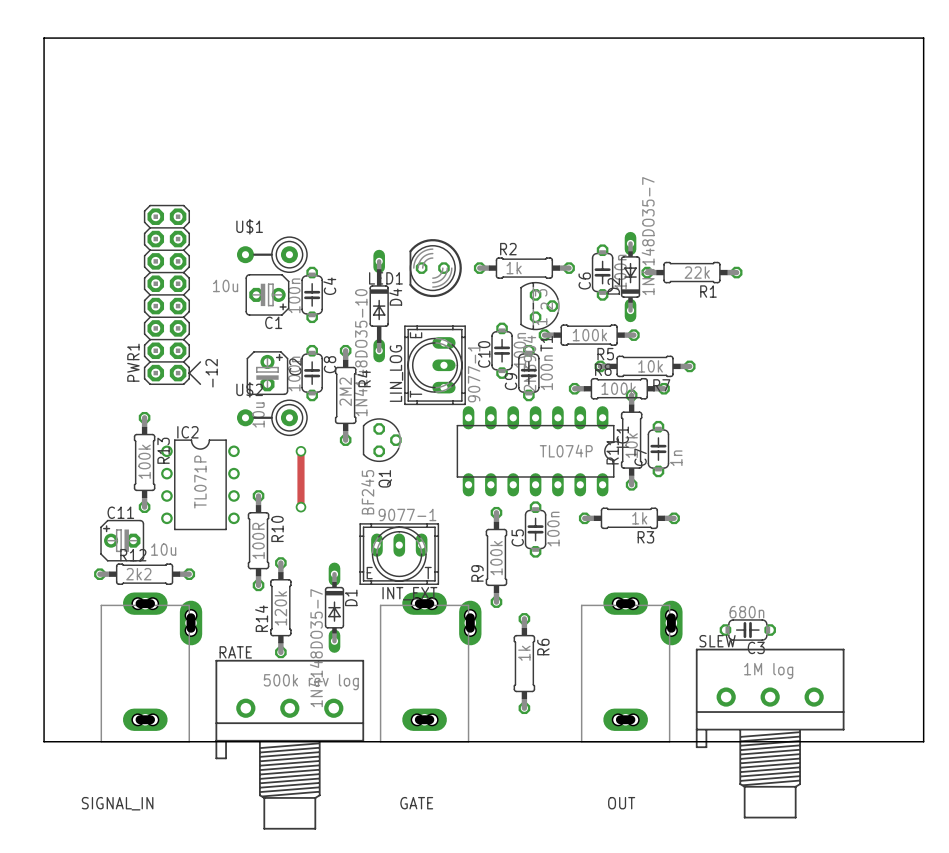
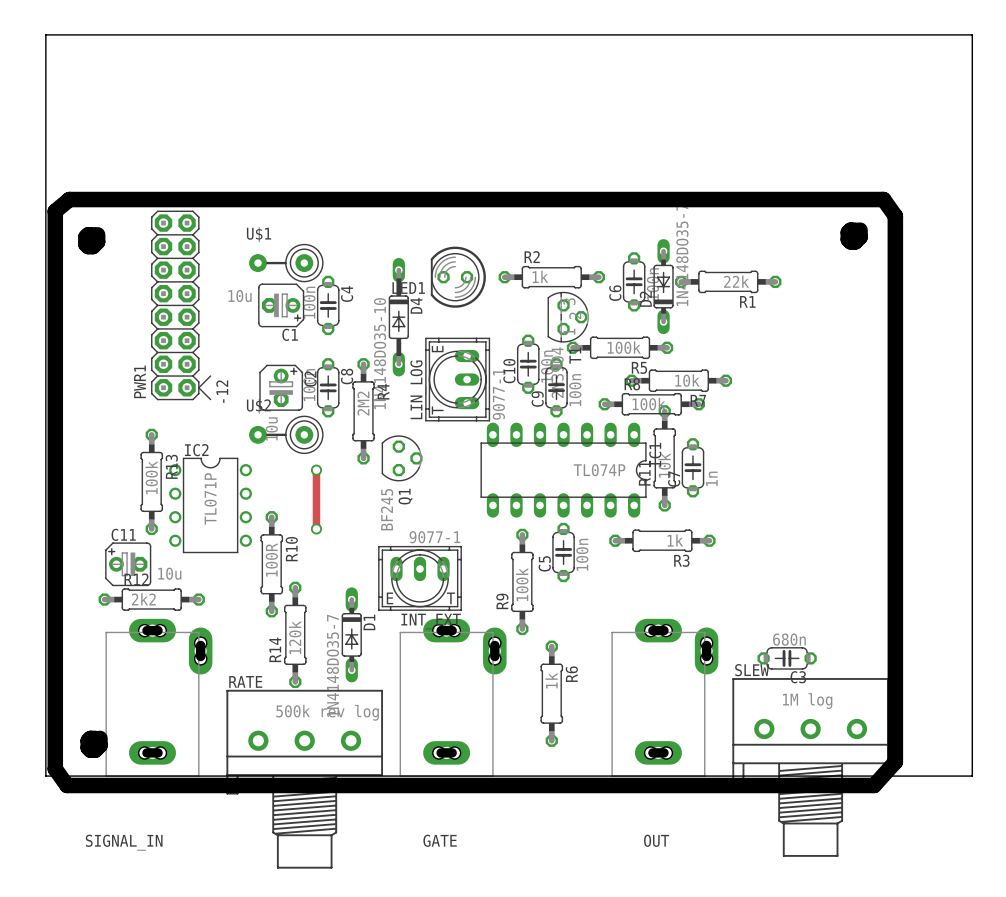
board edge: none -> (69, 199) (55, 211) (55, 769) (67, 785) (874, 785) (895, 761) (895, 216) (883, 199) (69, 199)
board edge: none -> (855, 230) (848, 232) (848, 239) (850, 241) (855, 241) (860, 237) (860, 230)
board edge: none -> (92, 234) (85, 237) (85, 244) (88, 246) (92, 246) (97, 241) (97, 234)
board edge: none -> (95, 738) (88, 740) (88, 747) (90, 750) (95, 750) (99, 745) (99, 738)

